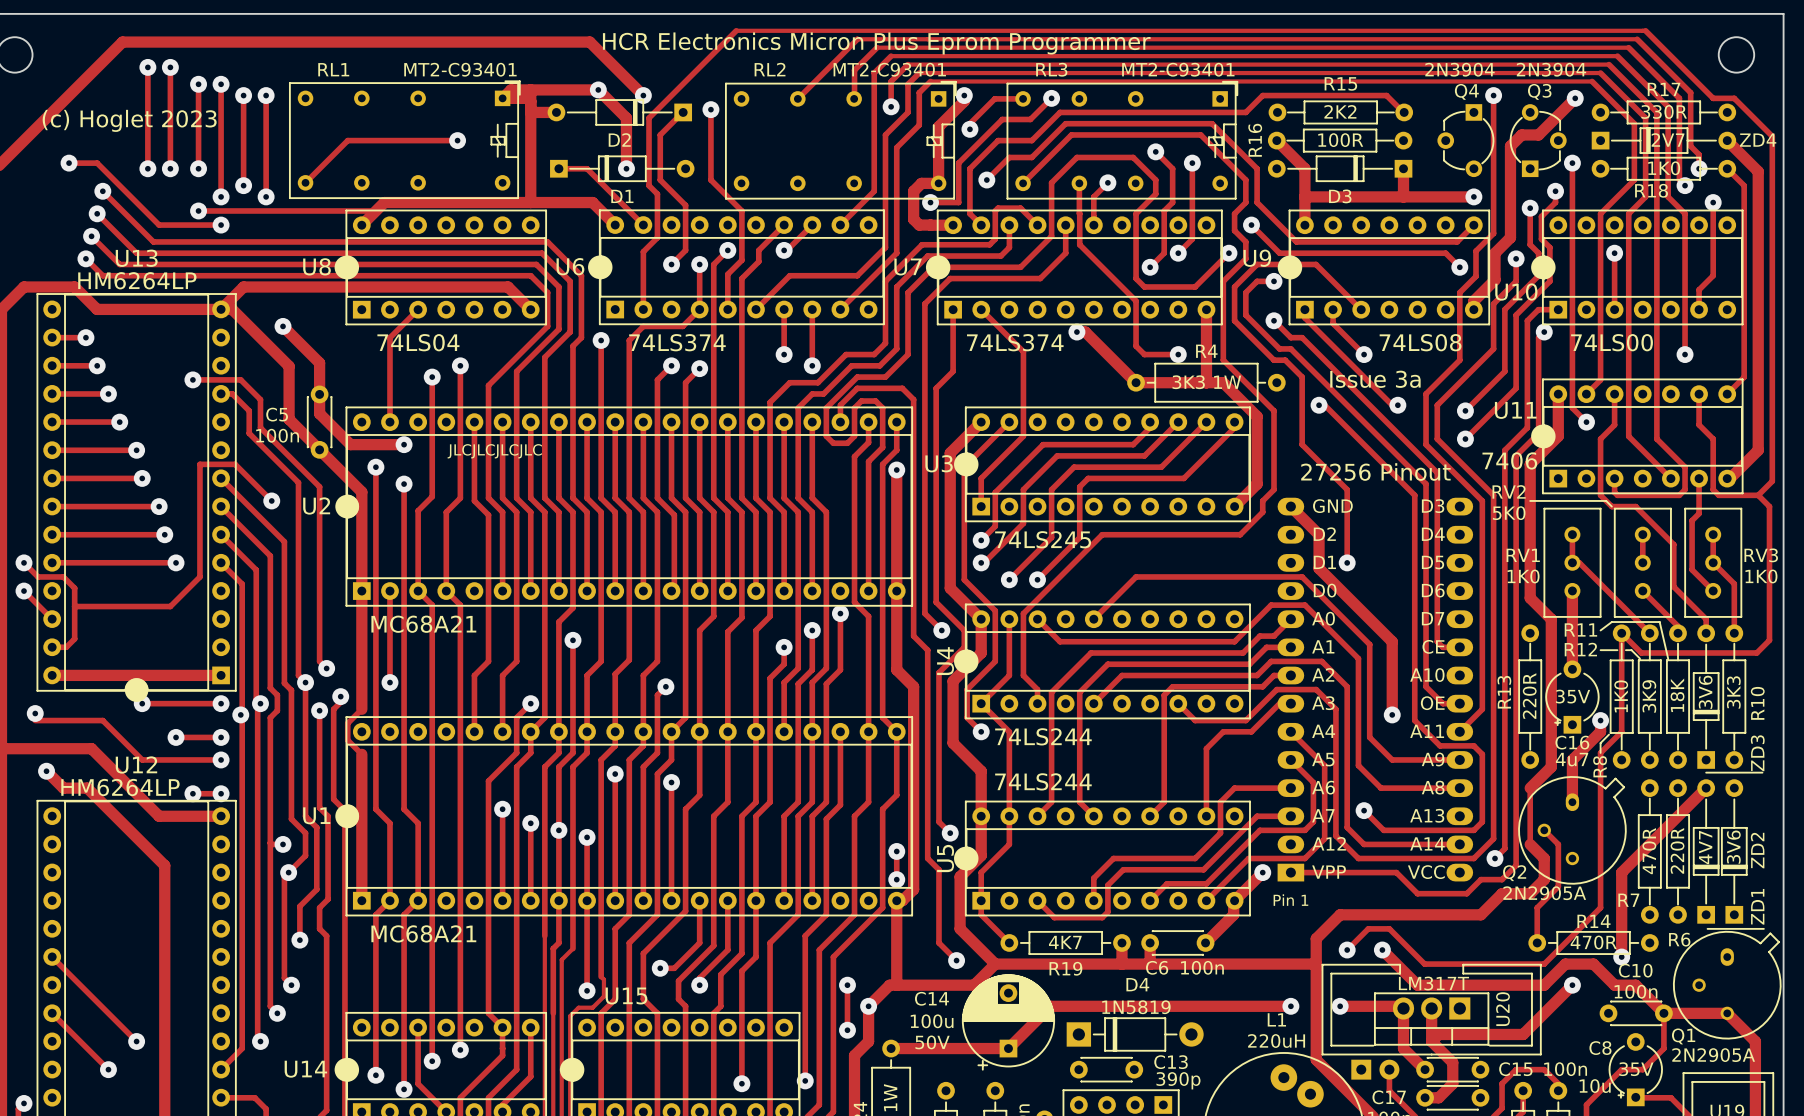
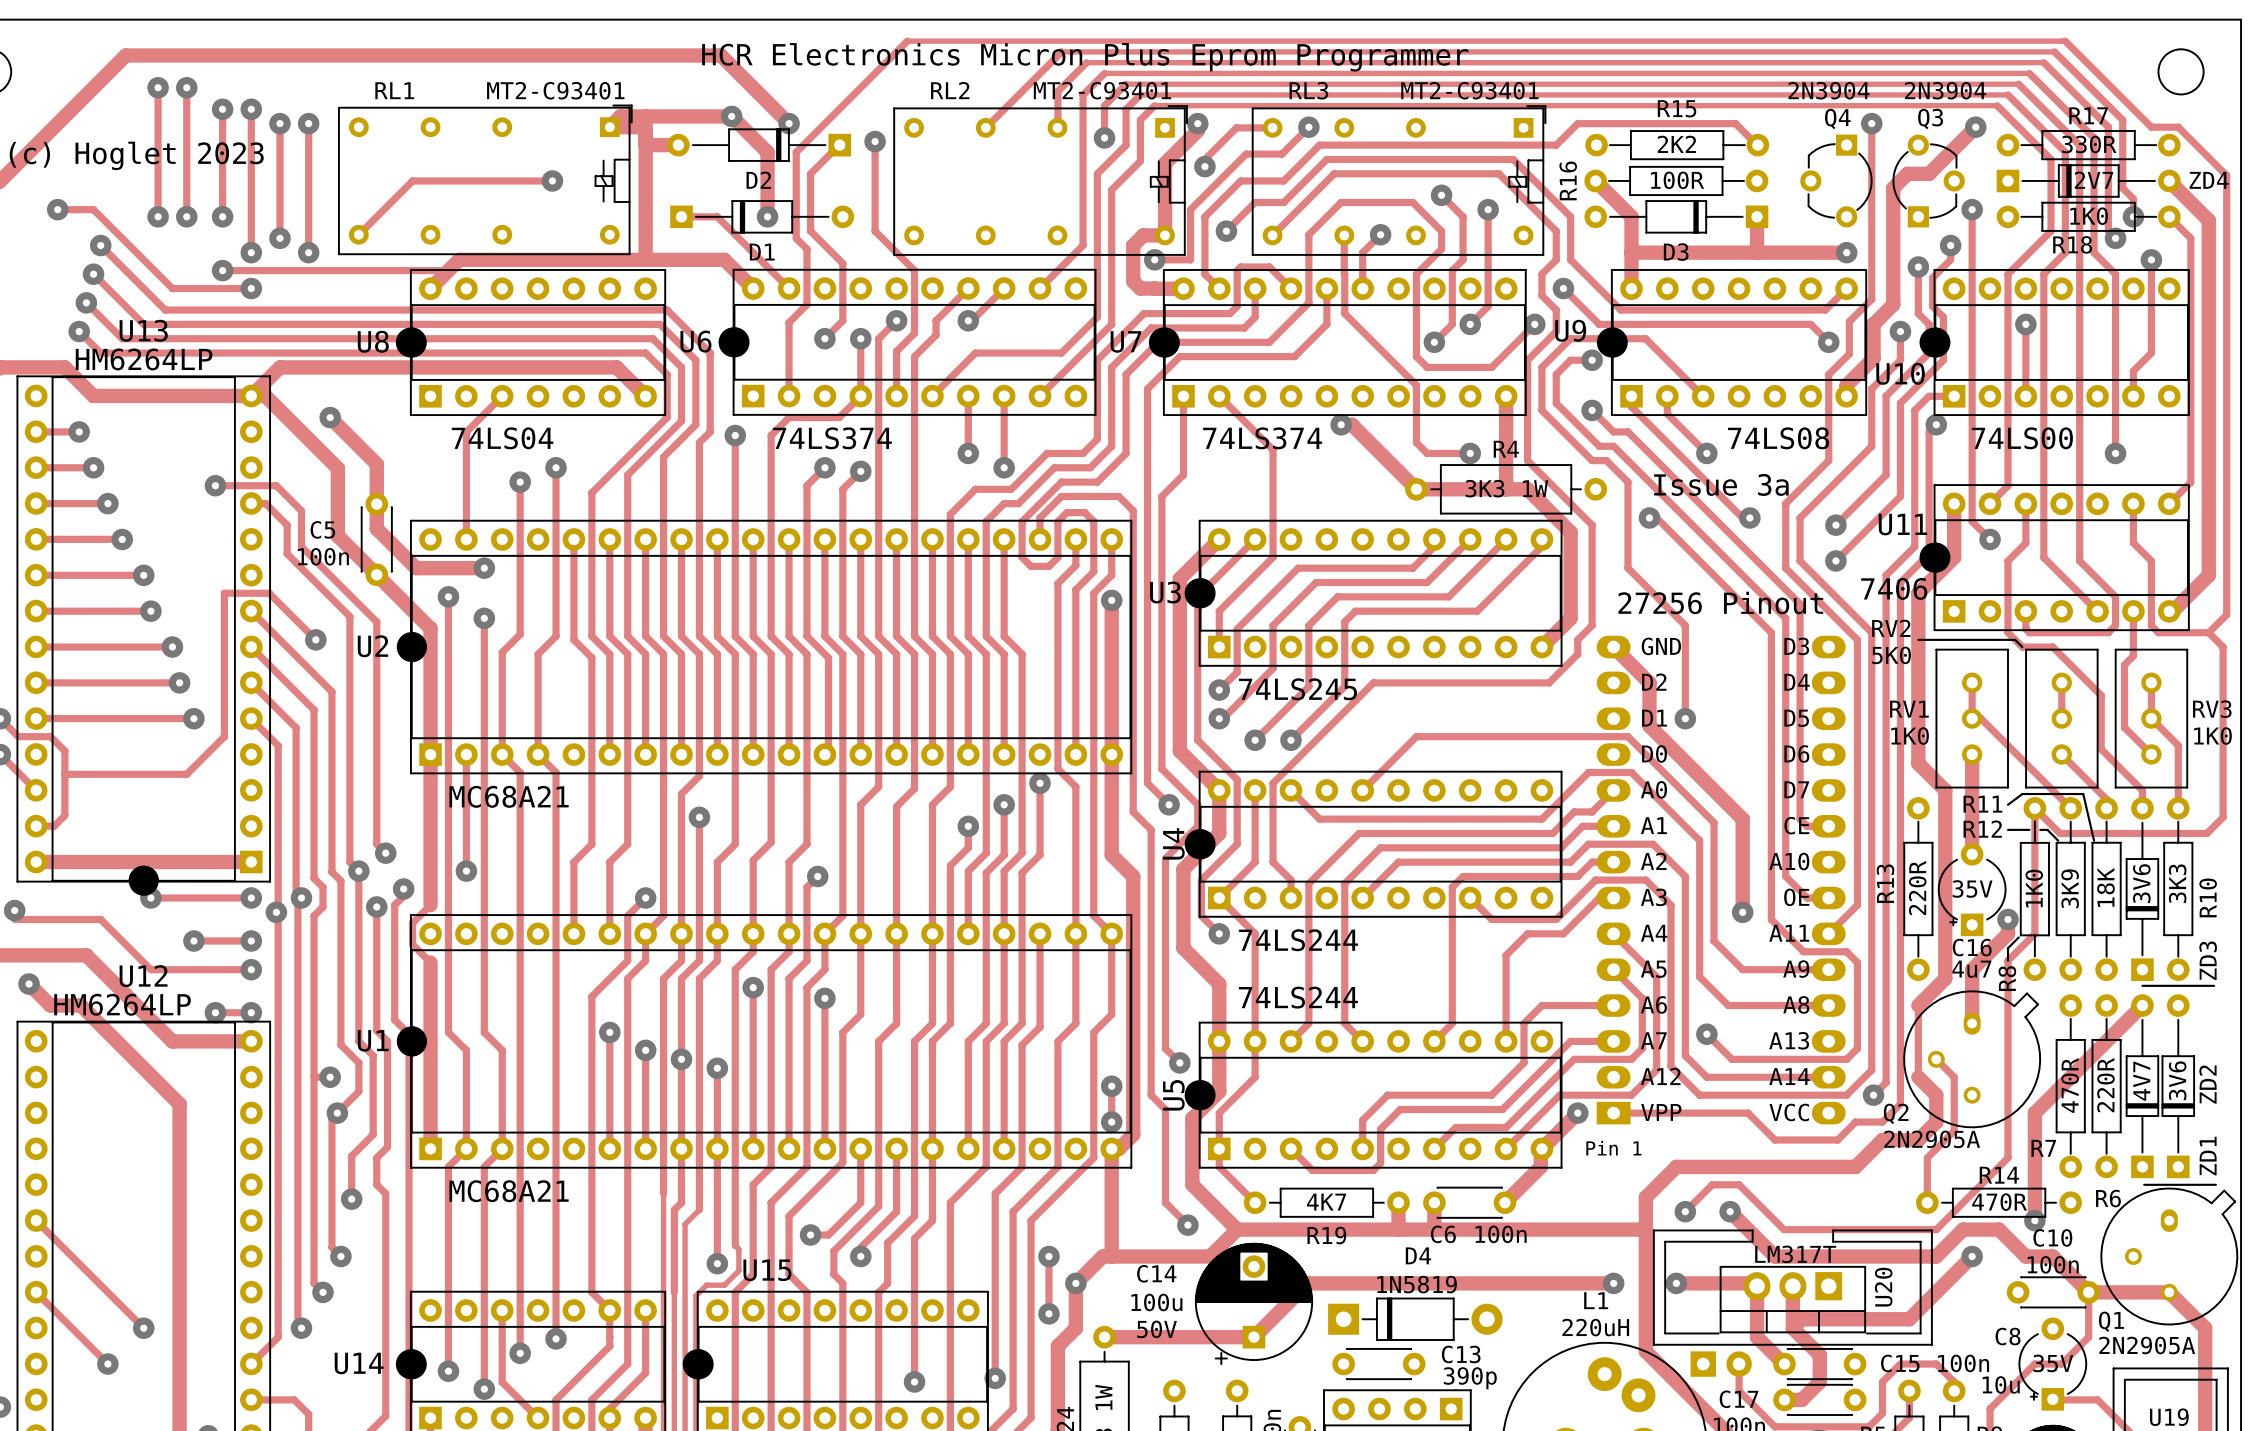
text: JLCJLCJLCJLC (494, 451) -> none

